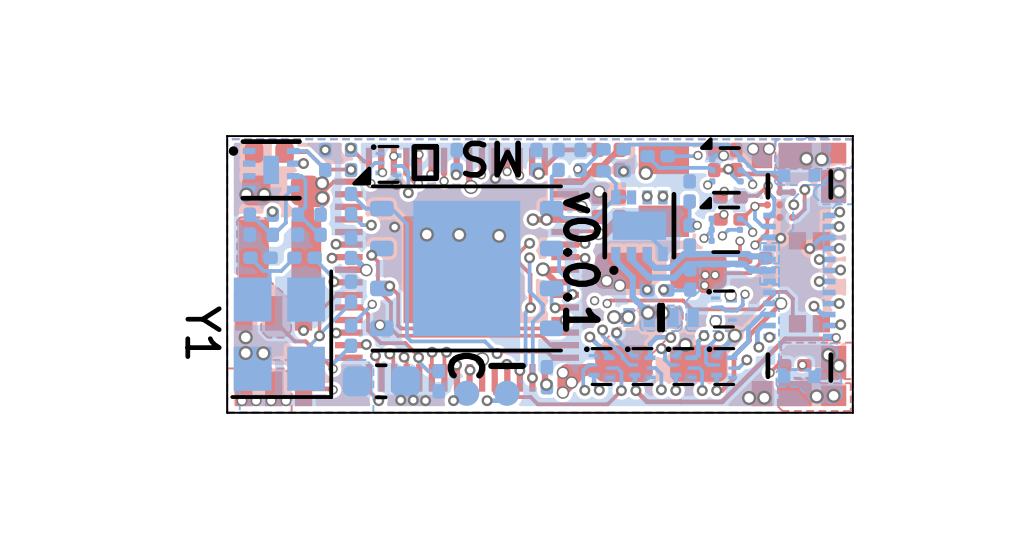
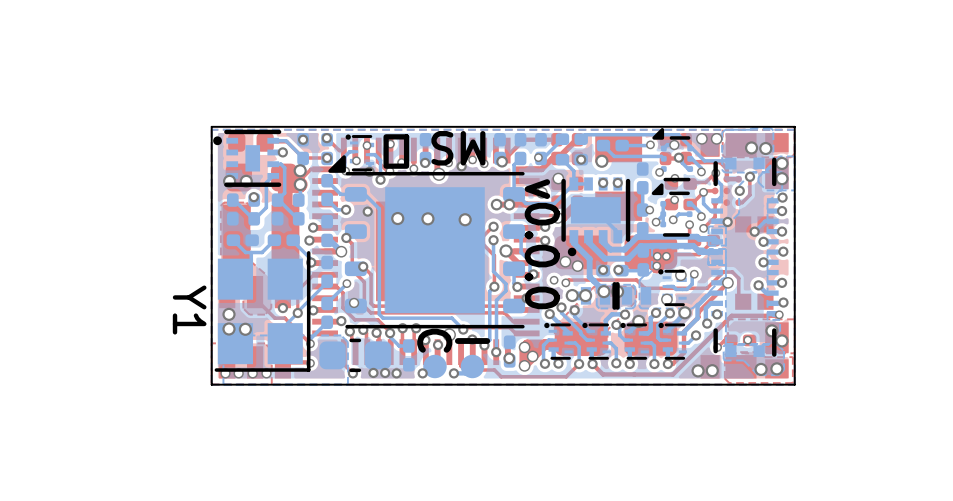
text: v0.0.1 (581, 262) -> v0.0.0 (542, 244)

